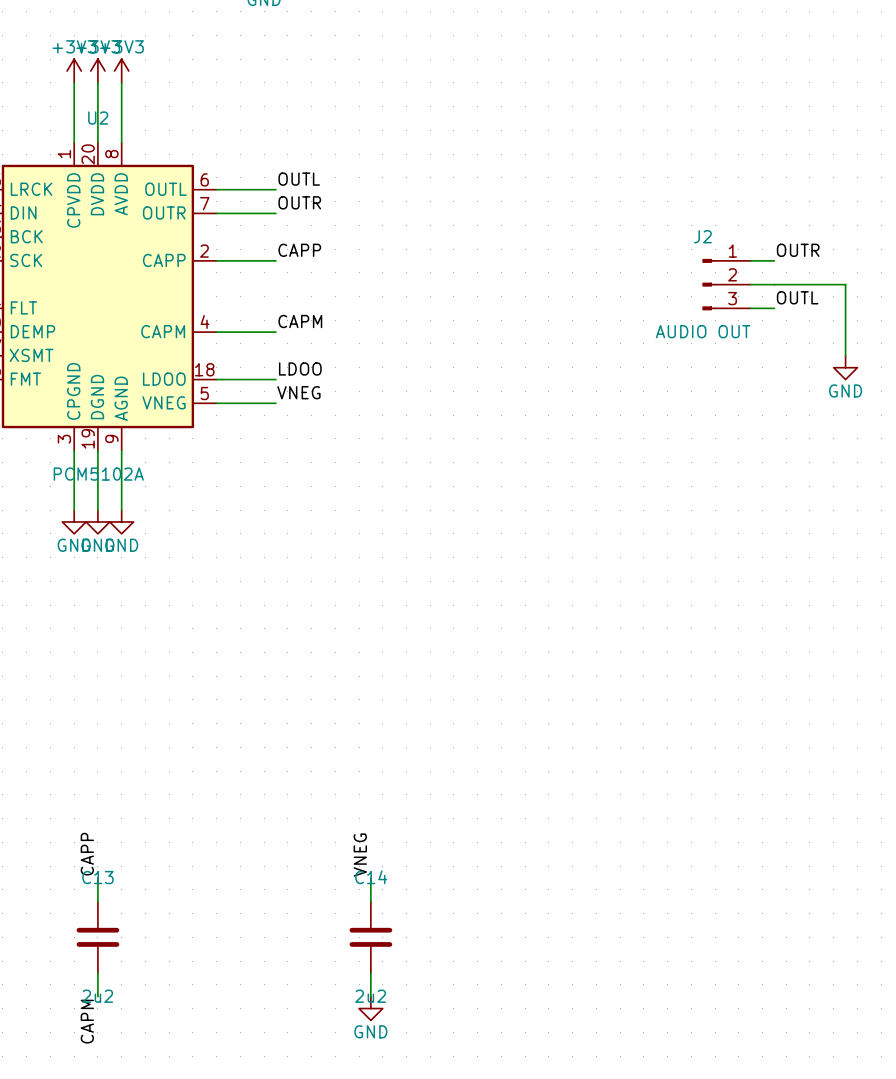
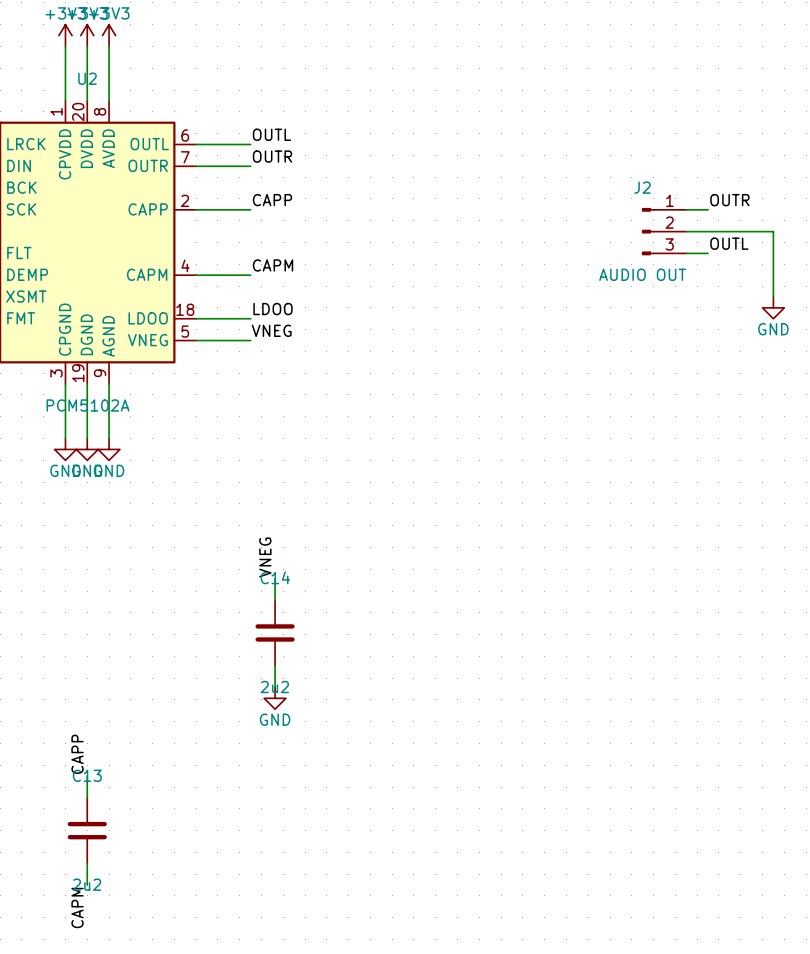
label position: VNEG (360, 855) -> VNEG (265, 557)
wire: (370, 878) (370, 901) -> (275, 578) (275, 600)
C14 position: (370, 937) -> (275, 632)
wire: (370, 972) (370, 996) -> (275, 665) (275, 687)
power symbol position: GND (370, 1008) -> GND (275, 698)

